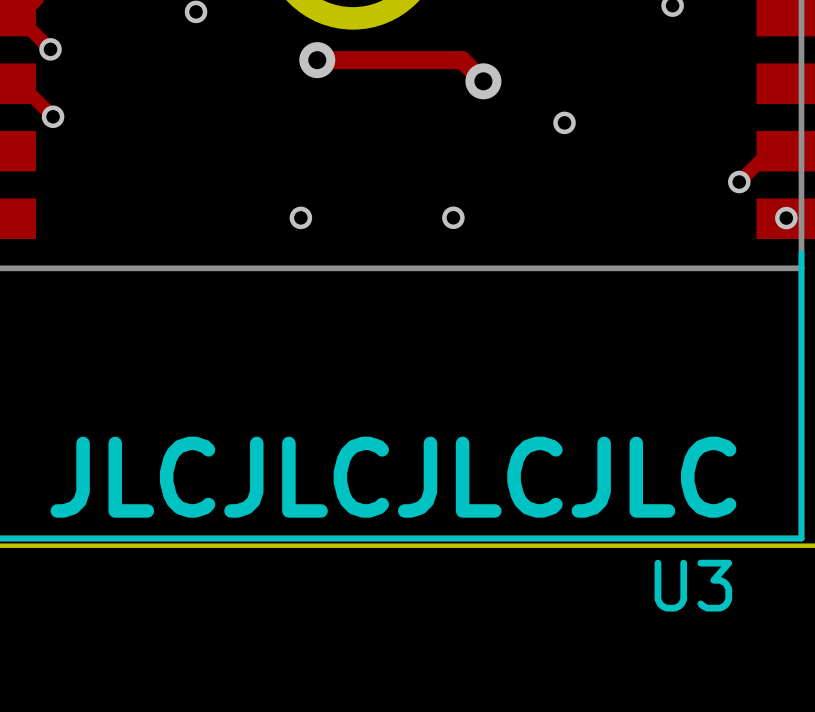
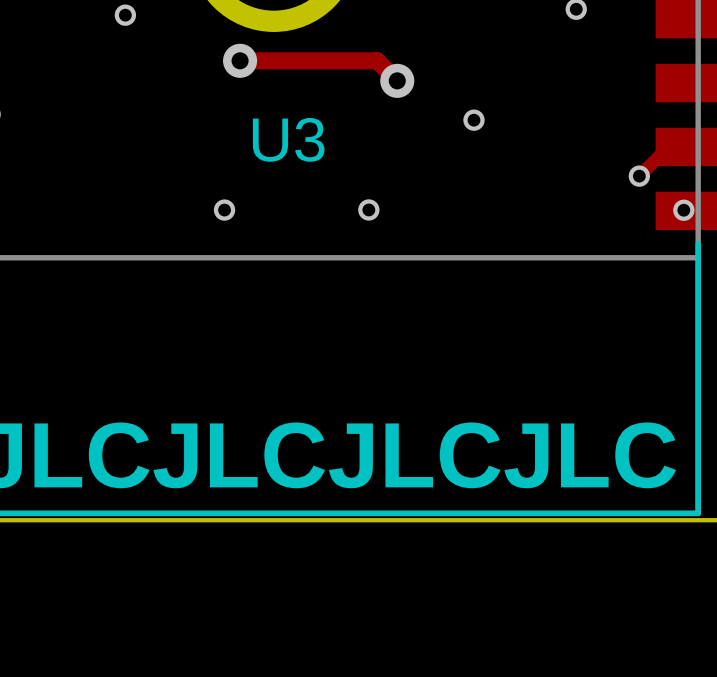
U3 name position: U3 (693, 585) -> U3 (288, 139)

